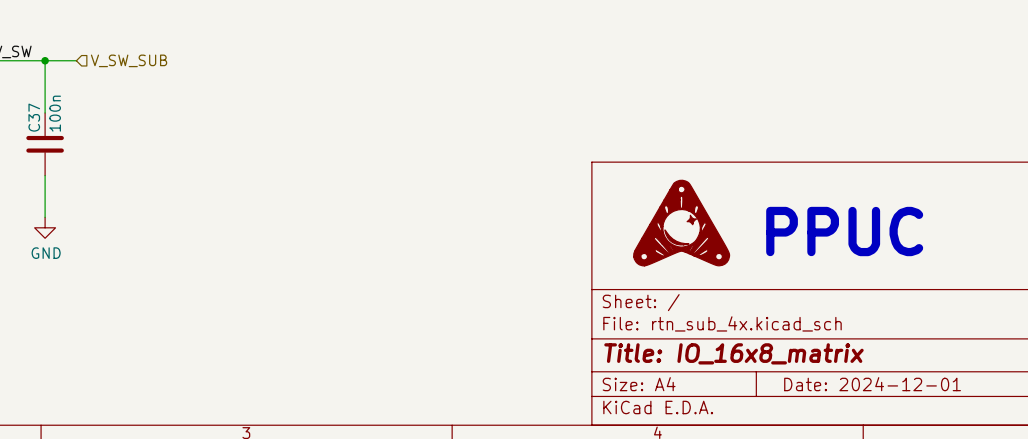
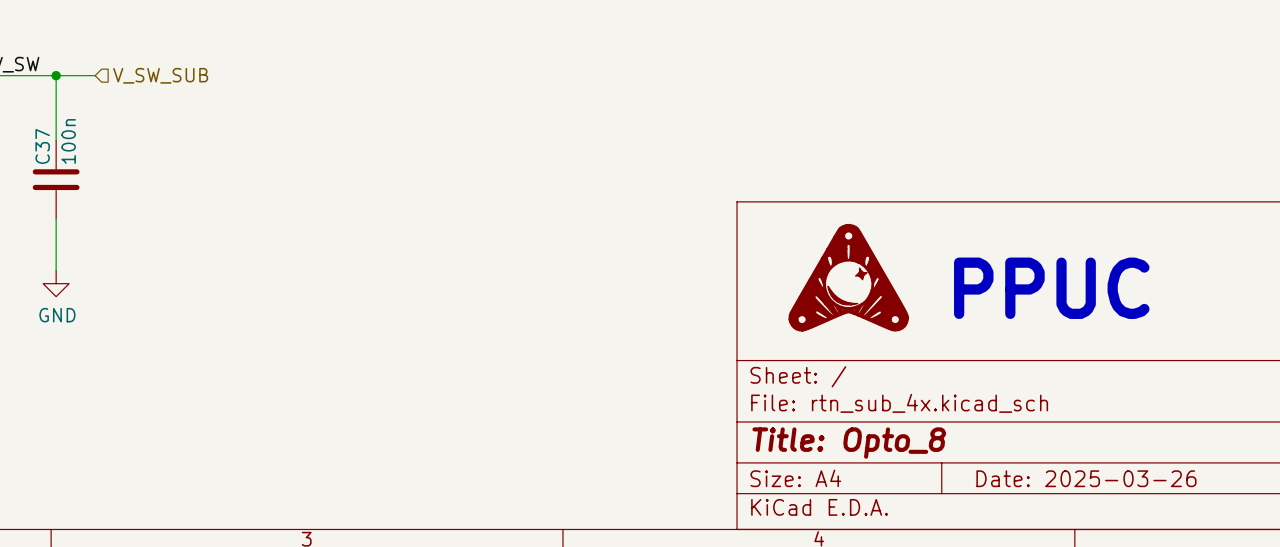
title block: Title: IO_16x8_matrix (733, 353) -> Title: Opto_8 (849, 443)
title block: Date: 2024-12-01 (872, 384) -> Date: 2025-03-26 (1086, 478)

